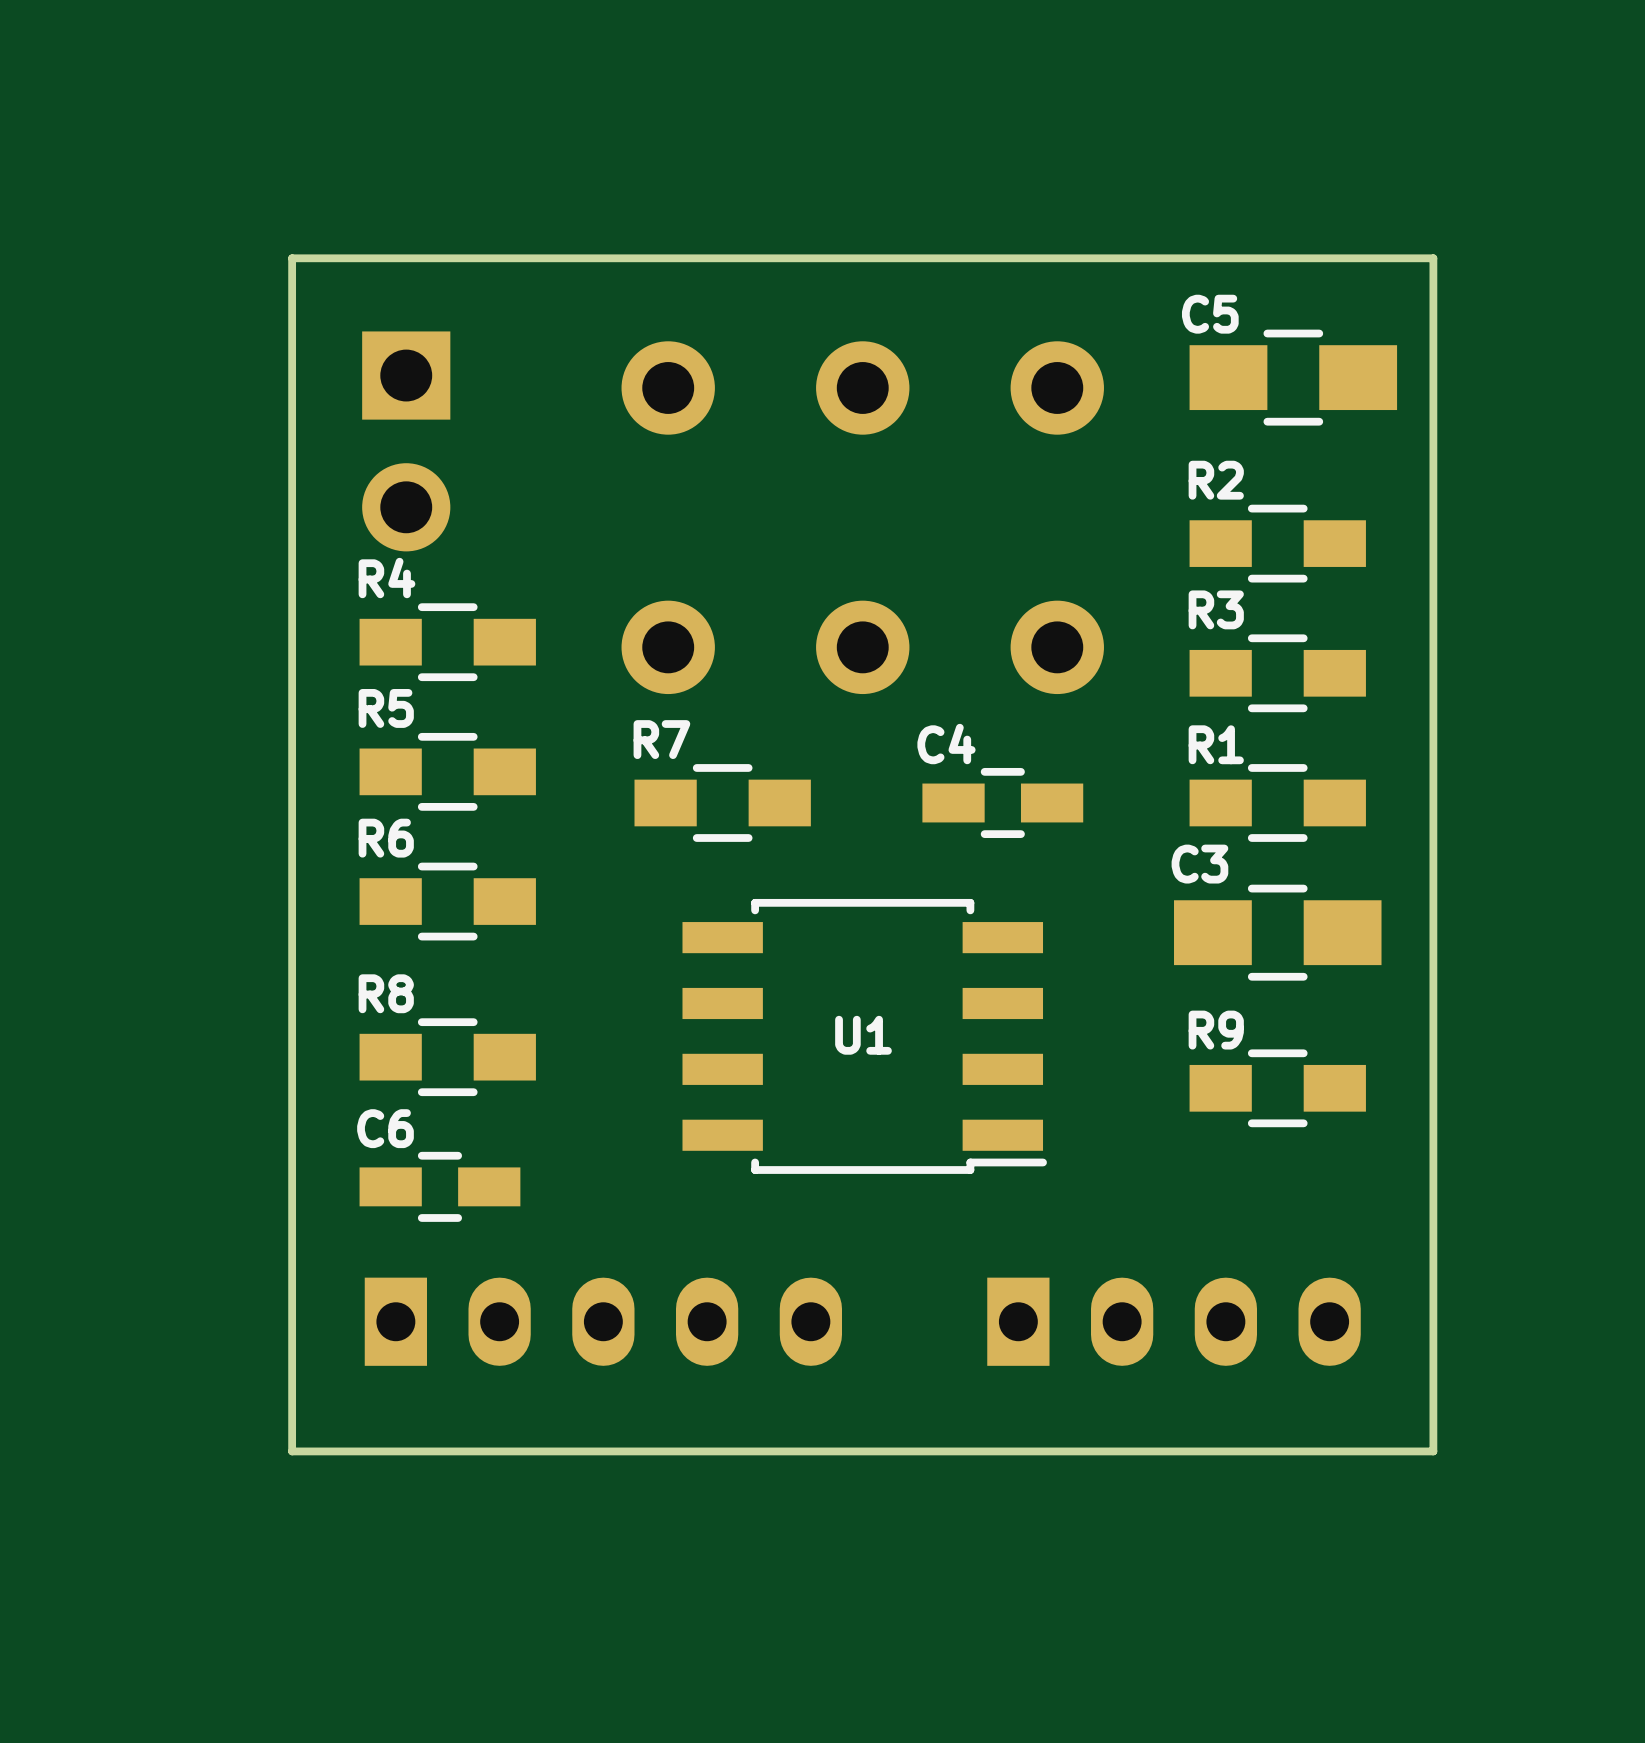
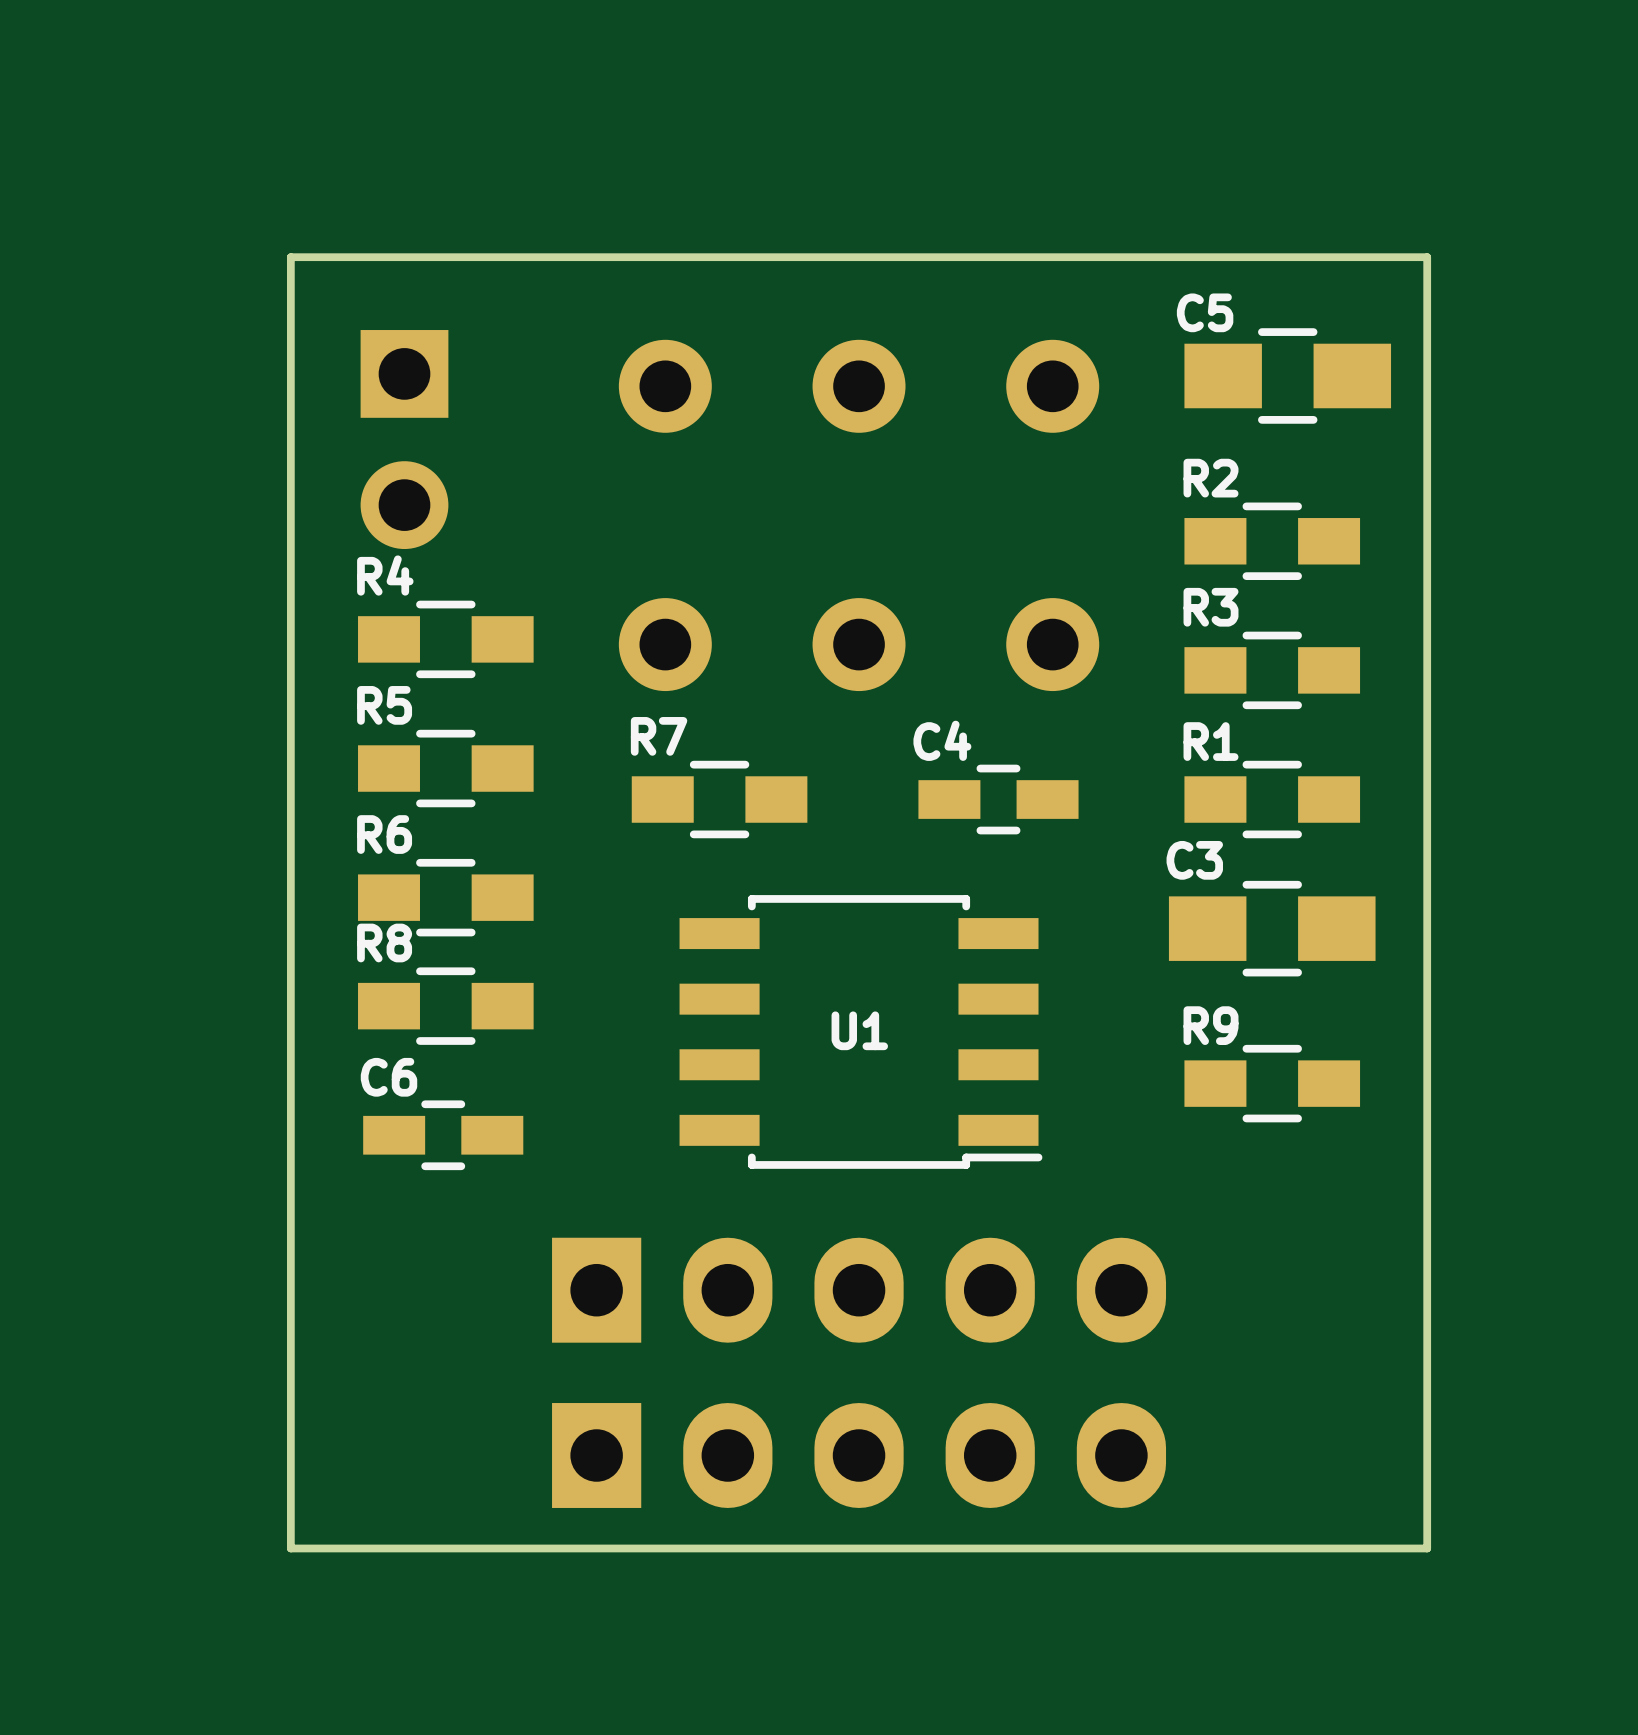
R8 position: (447, 1057) -> (445, 1006)
C6 position: (439, 1186) -> (443, 1135)
part: none -> (859, 1290)
part: (603, 1321) -> none
part: (1174, 1321) -> none
board edge: (292, 1451) (1433, 1451) -> (290, 1445) (290, 1548) (1427, 1548) (1427, 1445)
part: none -> (859, 1455)

